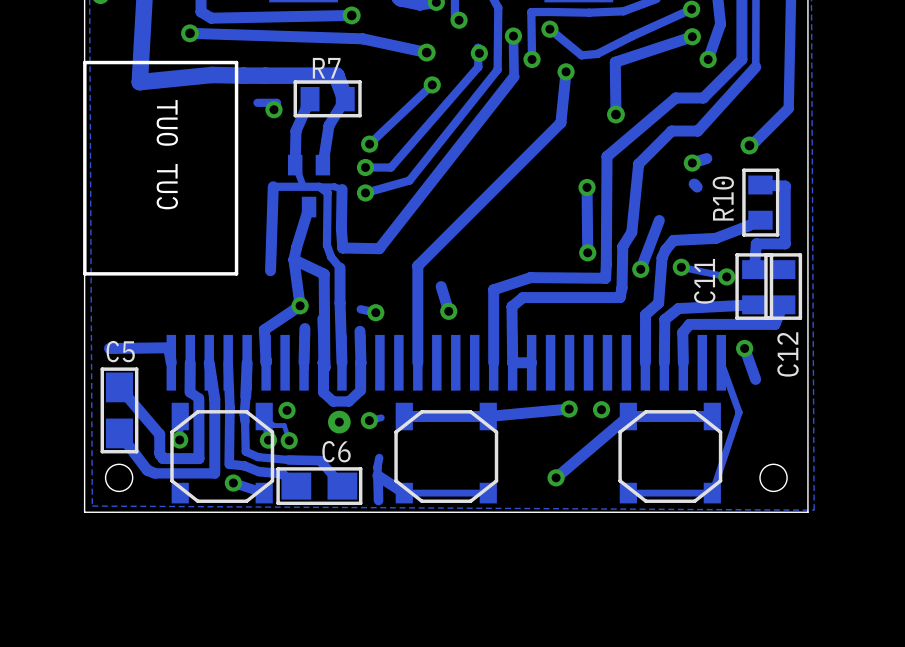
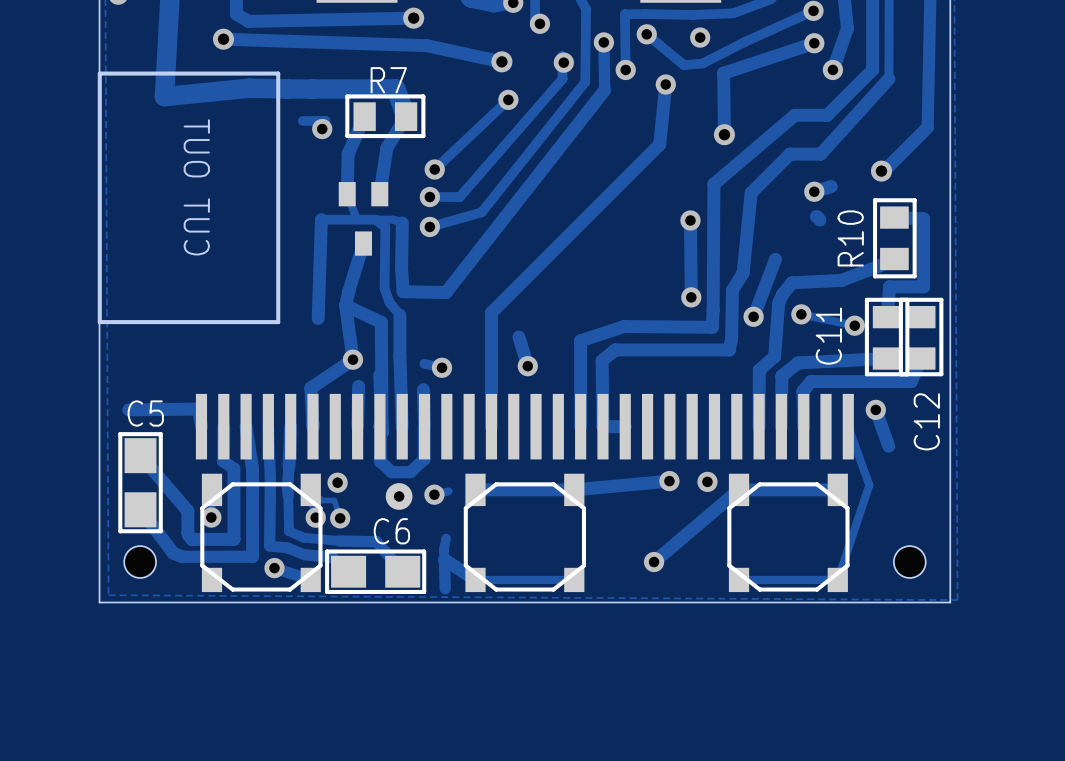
via: none -> (700, 37)

